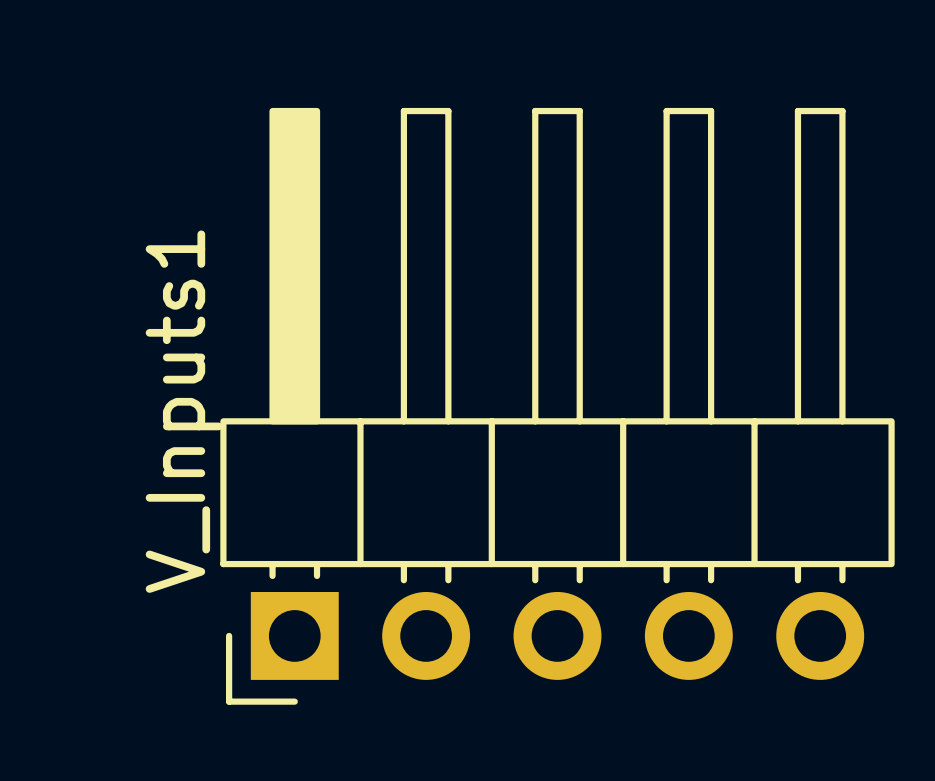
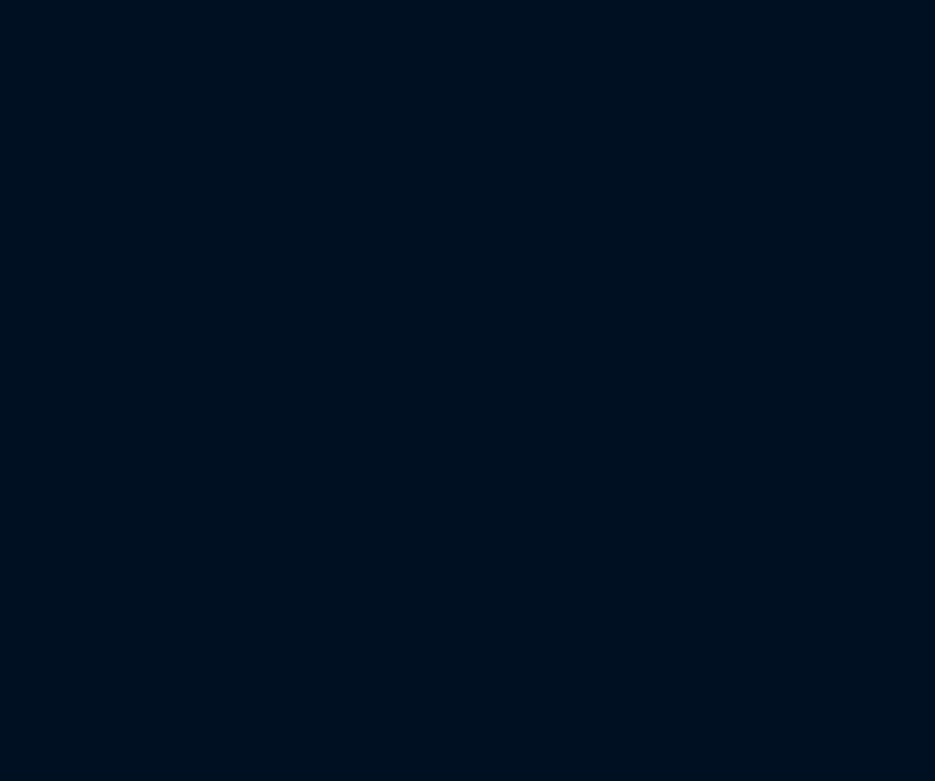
V_Inputs1: (557, 406) -> none

